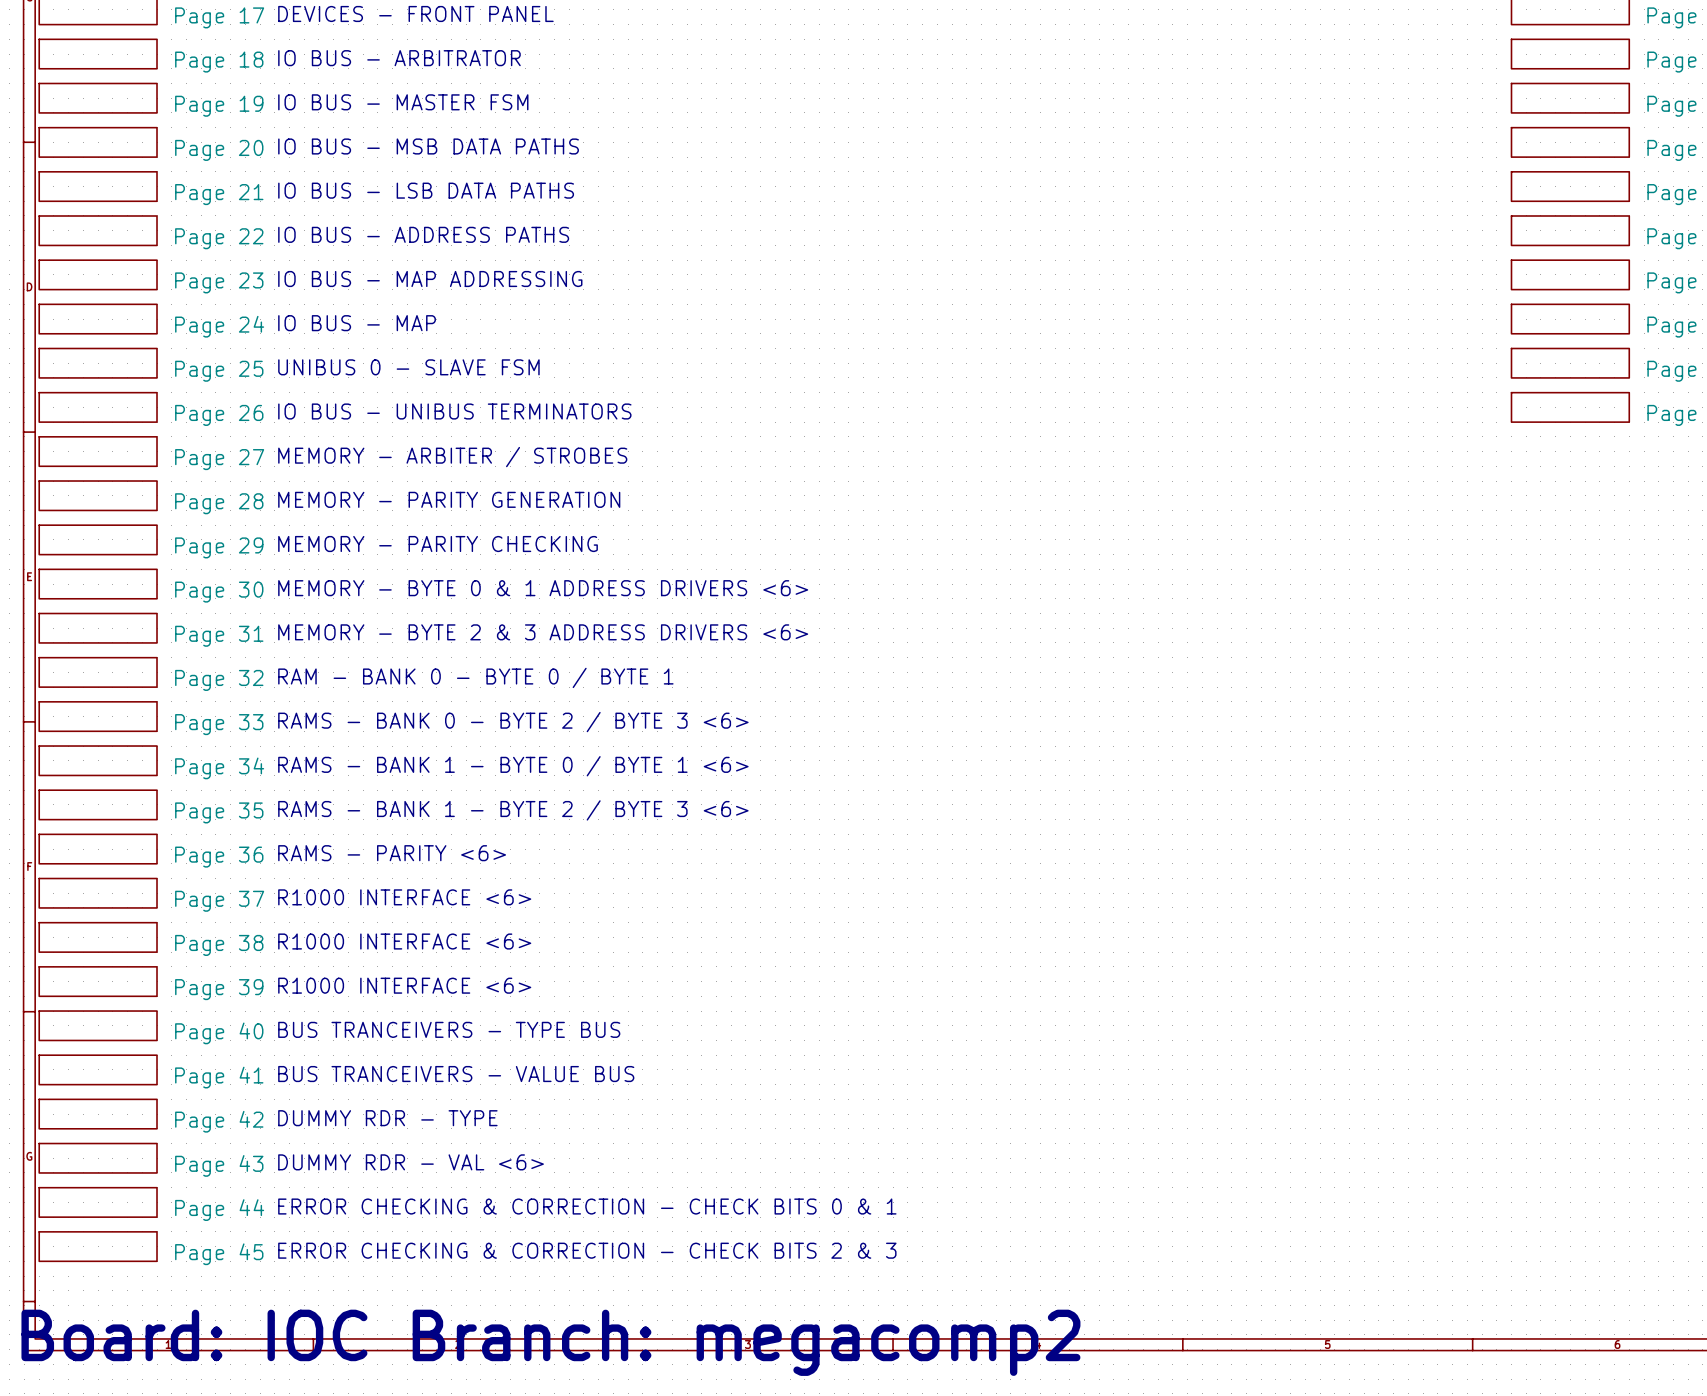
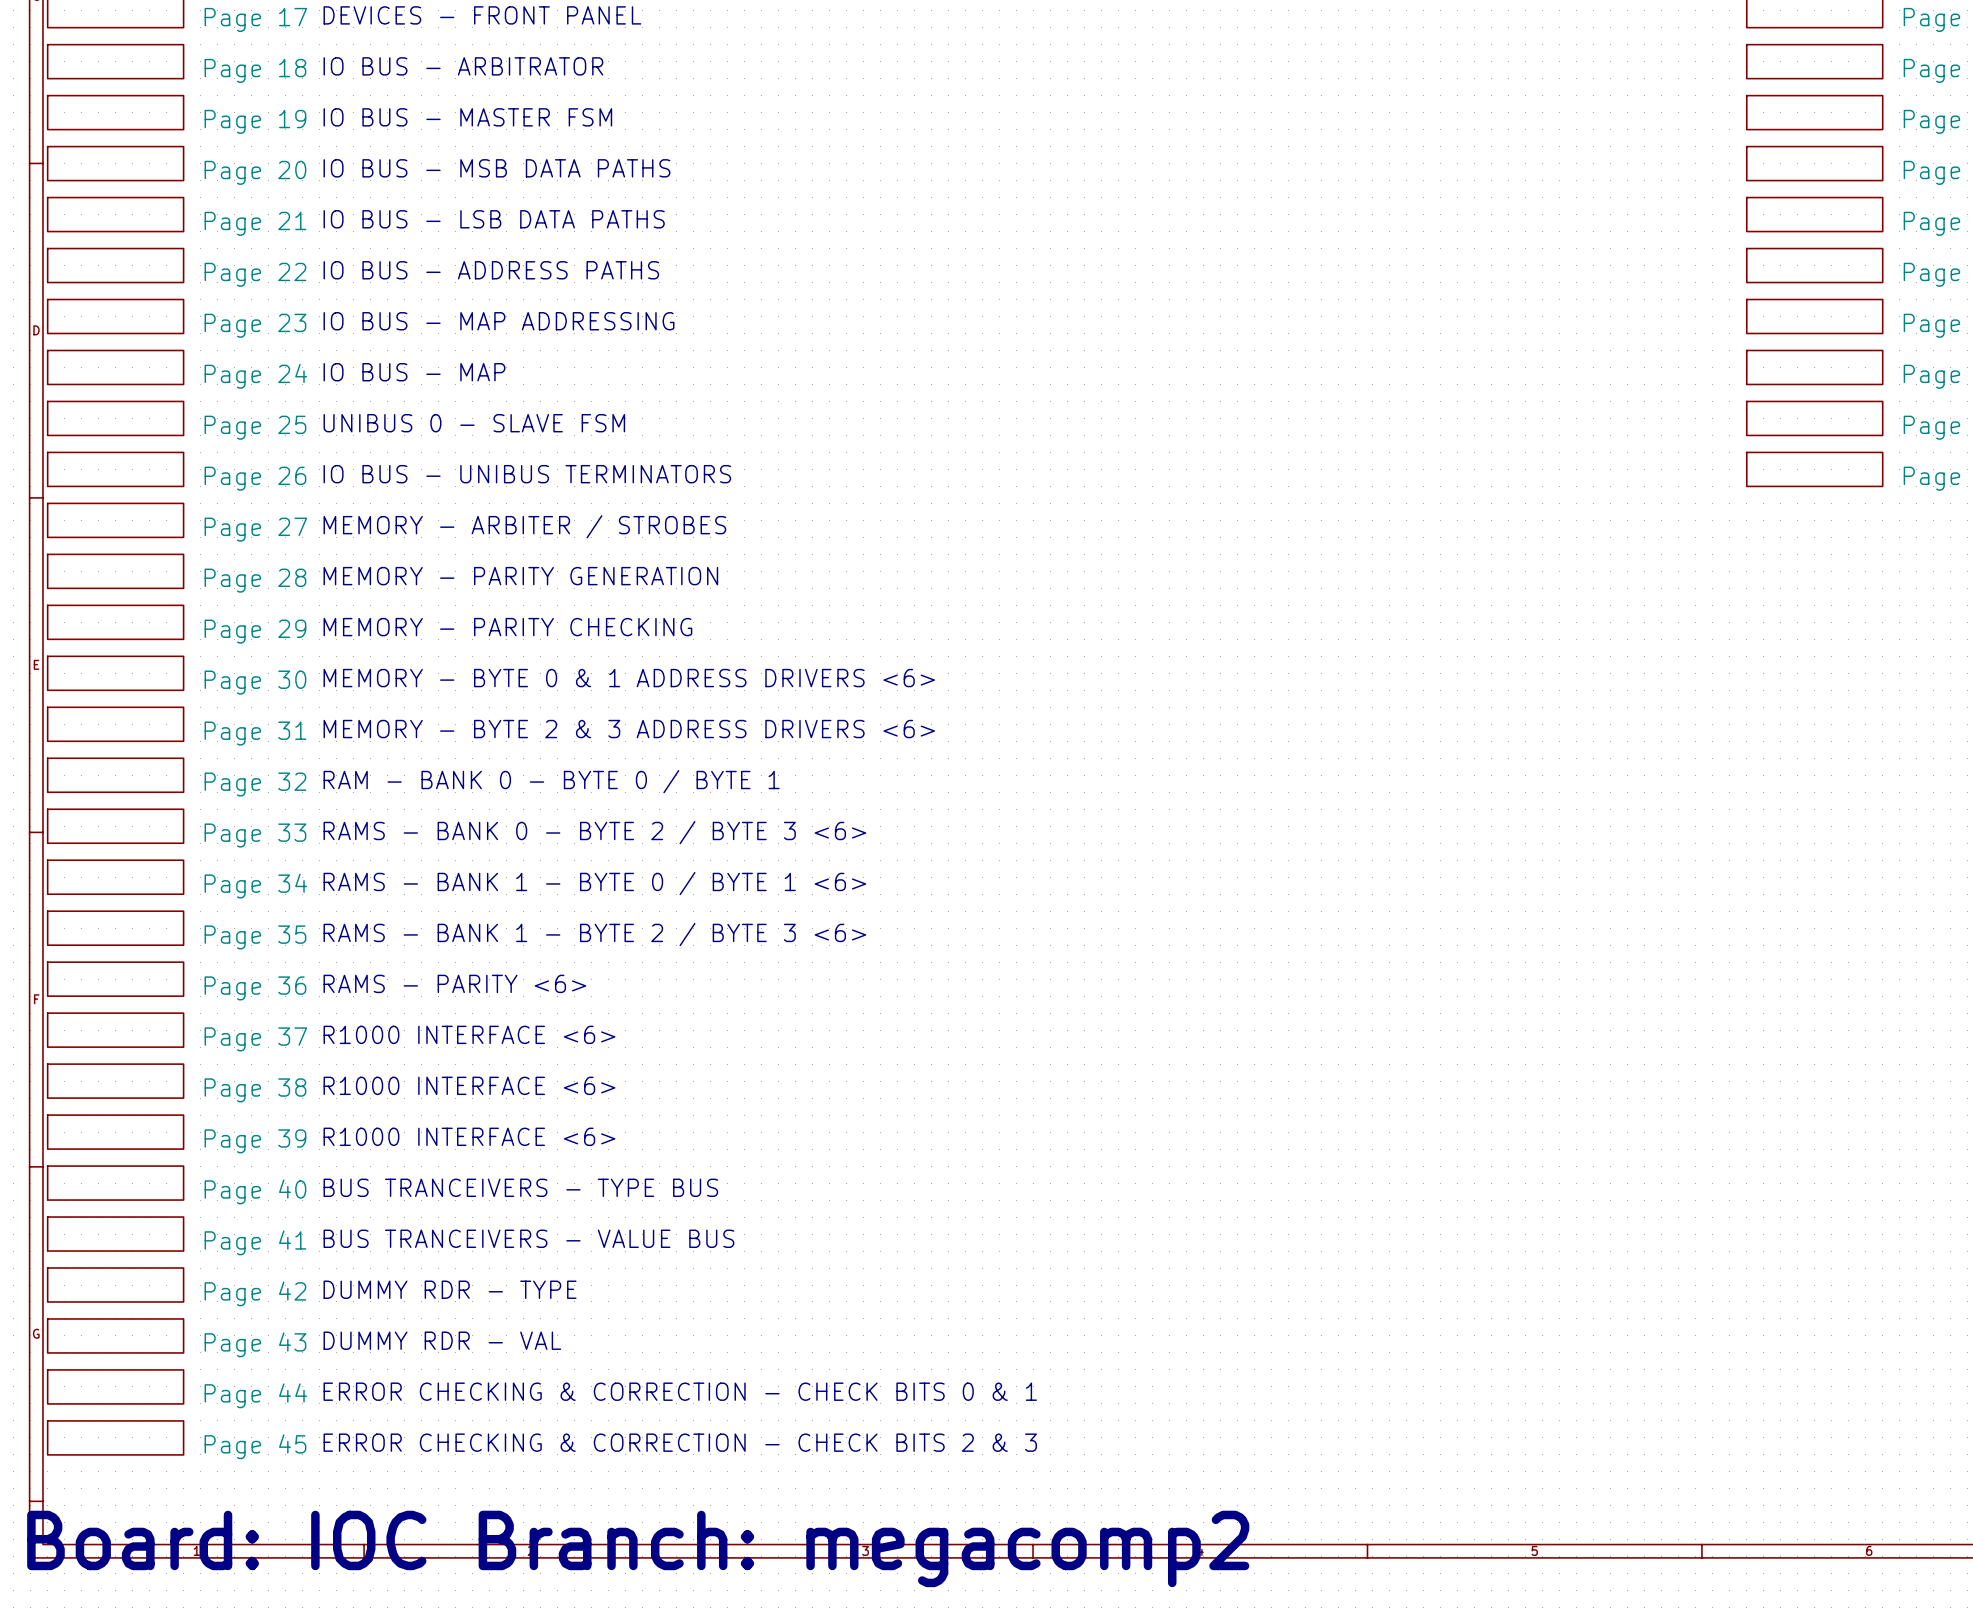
text: DUMMY RDR - VAL <6> (411, 1162) -> DUMMY RDR - VAL (442, 1340)

